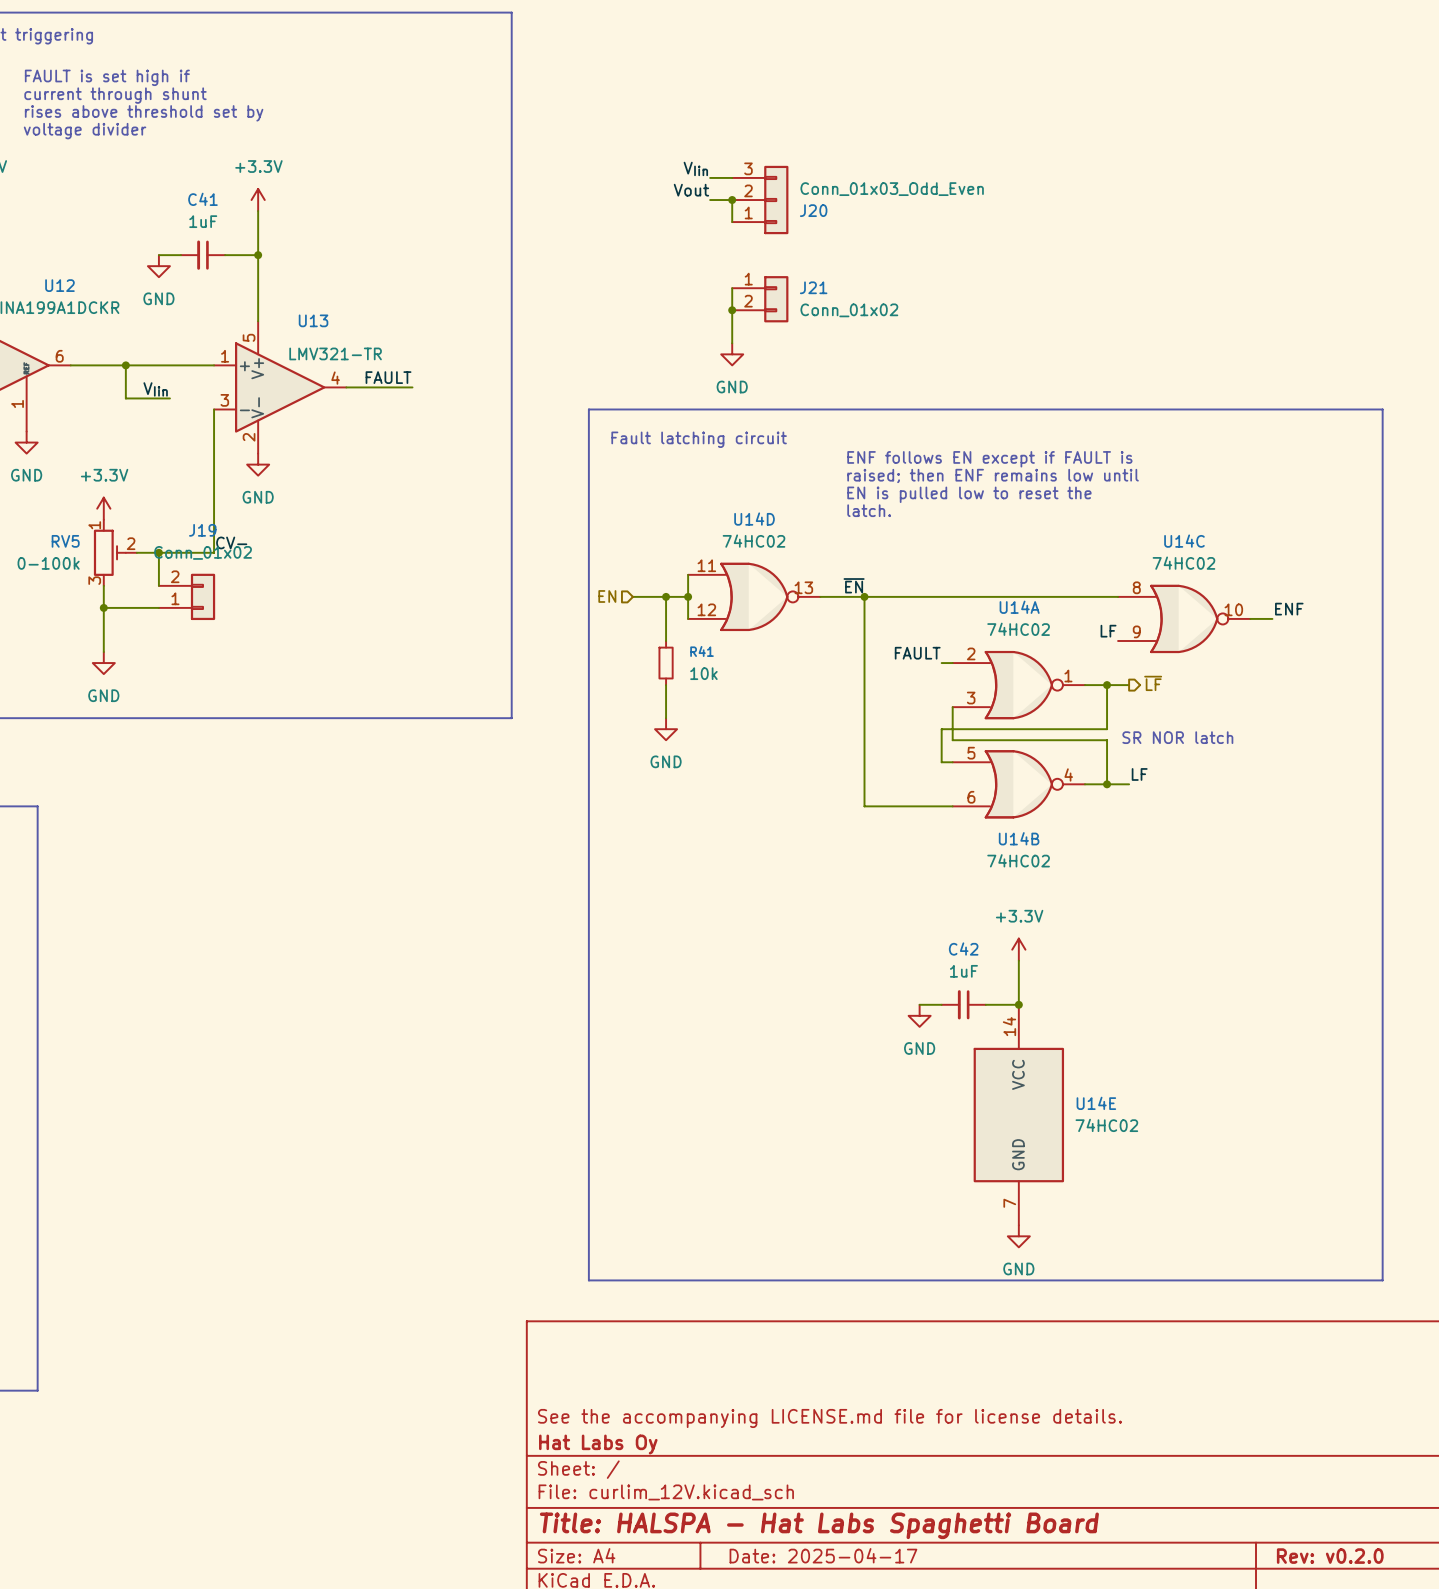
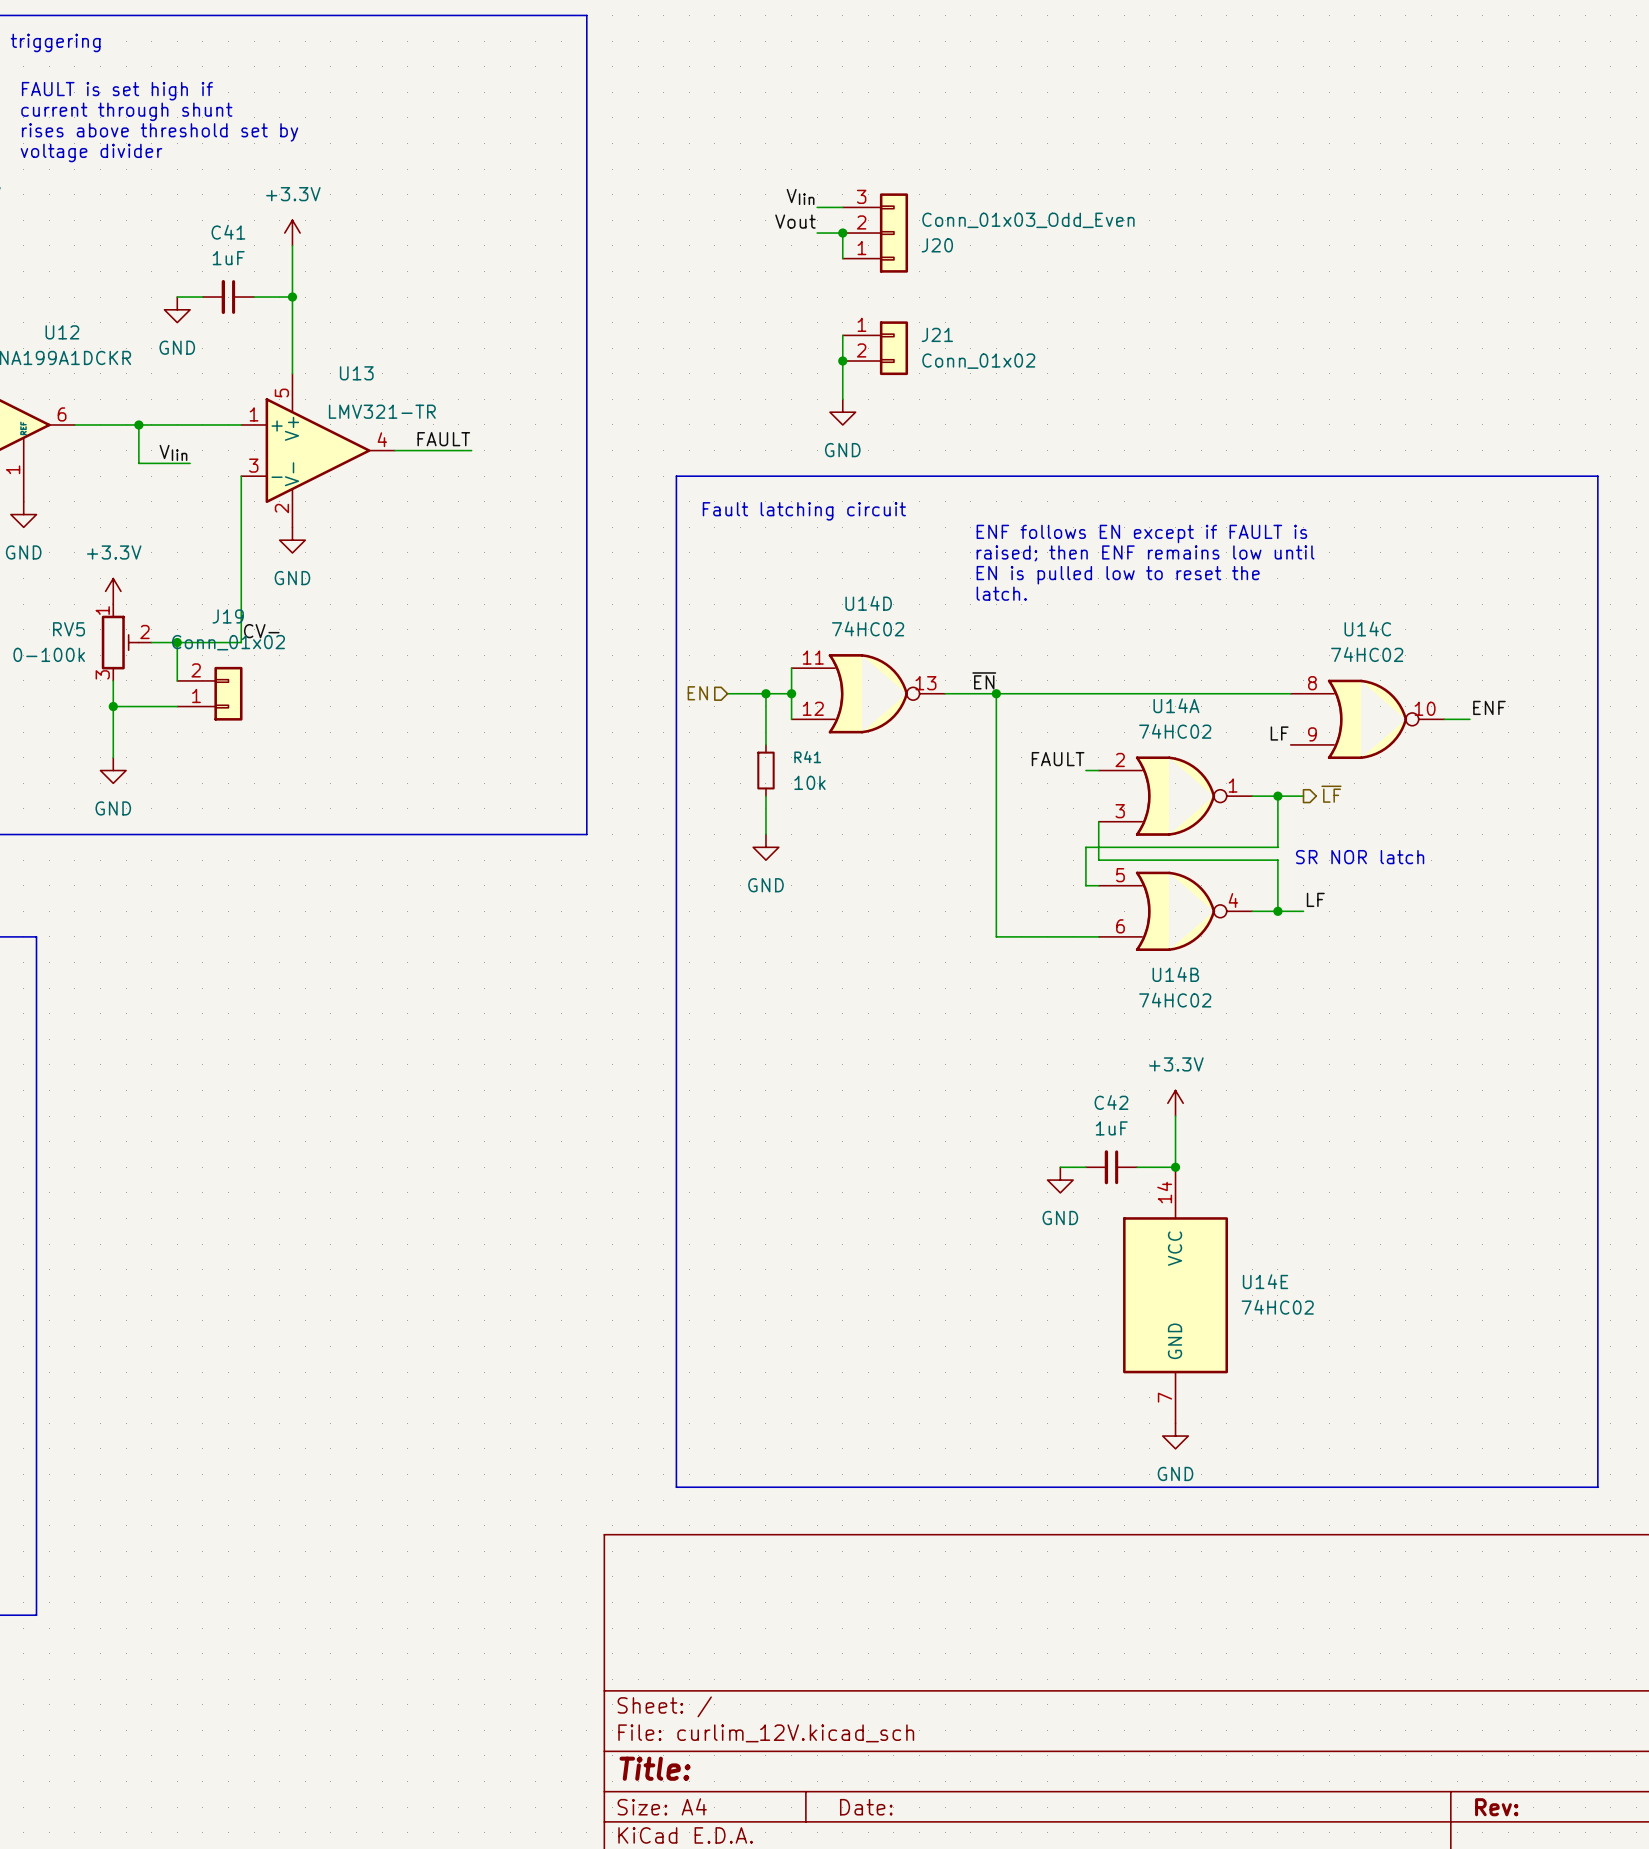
title block: See the accompanying LICENSE.md file for license details. (829, 1418) -> none
title block: Hat Labs Oy (598, 1444) -> none
title block: Title: HALSPA - Hat Labs Spaghetti Board (819, 1525) -> Title: (655, 1768)
title block: Date: 2025-04-17 (823, 1555) -> Date: (866, 1807)
title block: Rev: v0.2.0 (1330, 1556) -> Rev: (1496, 1807)

